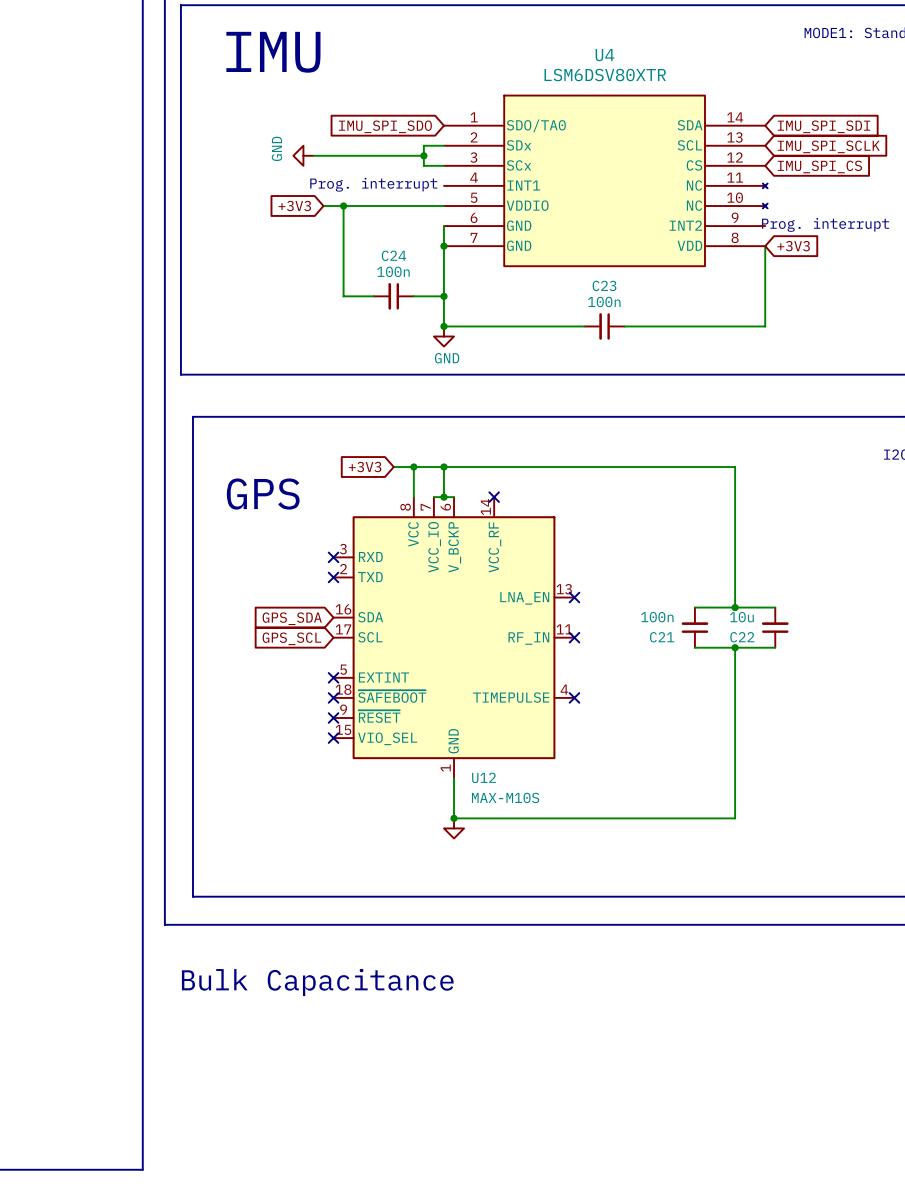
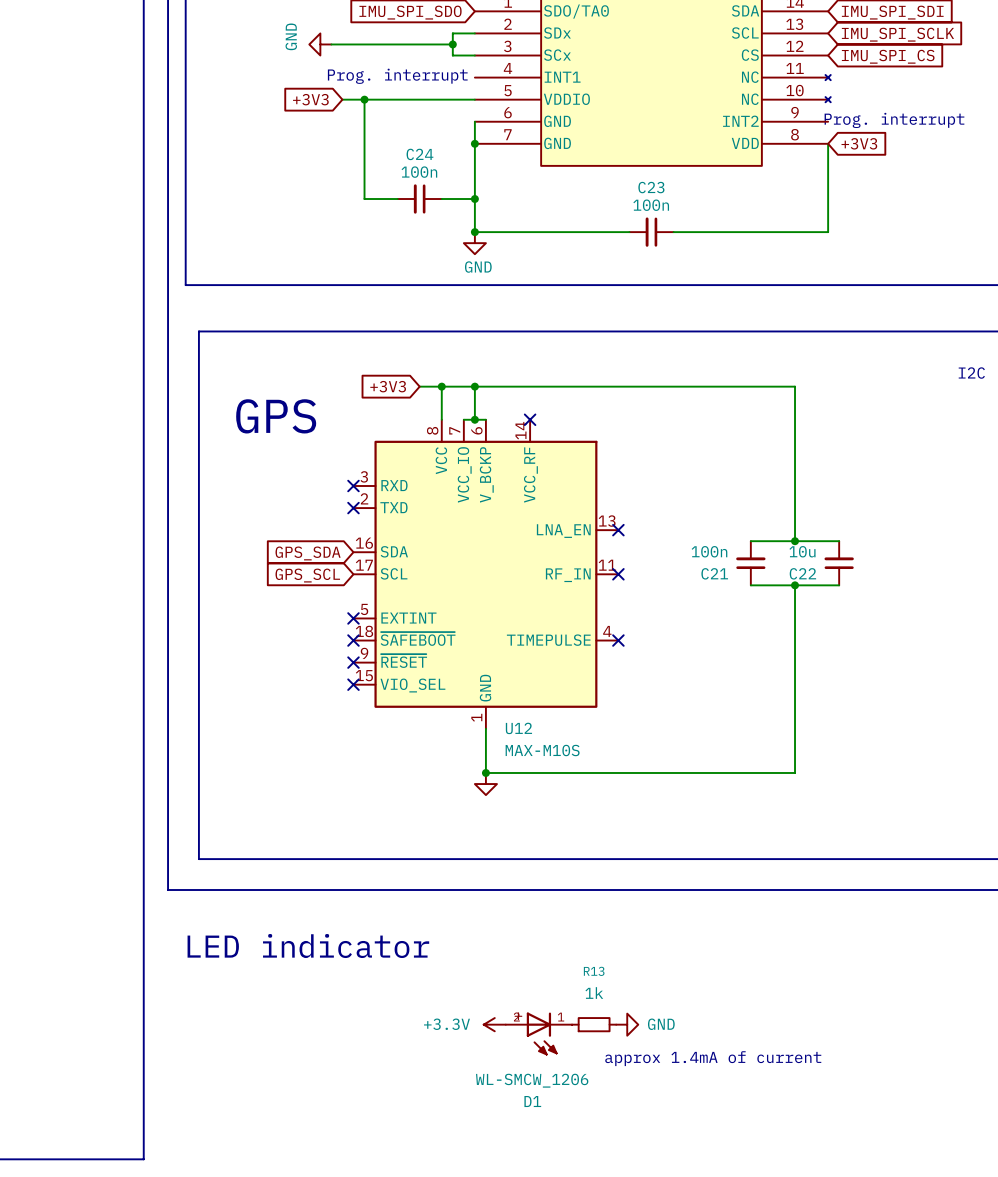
text: none -> LED indicator (308, 946)
text: Bulk Capacitance (317, 982) -> none
power symbol: none -> +3.3V (494, 1024)
R13: none -> 1k (594, 1024)
power symbol: none -> GND (627, 1024)
D1: none -> WL-SMCW_1206 (538, 1033)
text: none -> approx 1.4mA of current (713, 1058)

